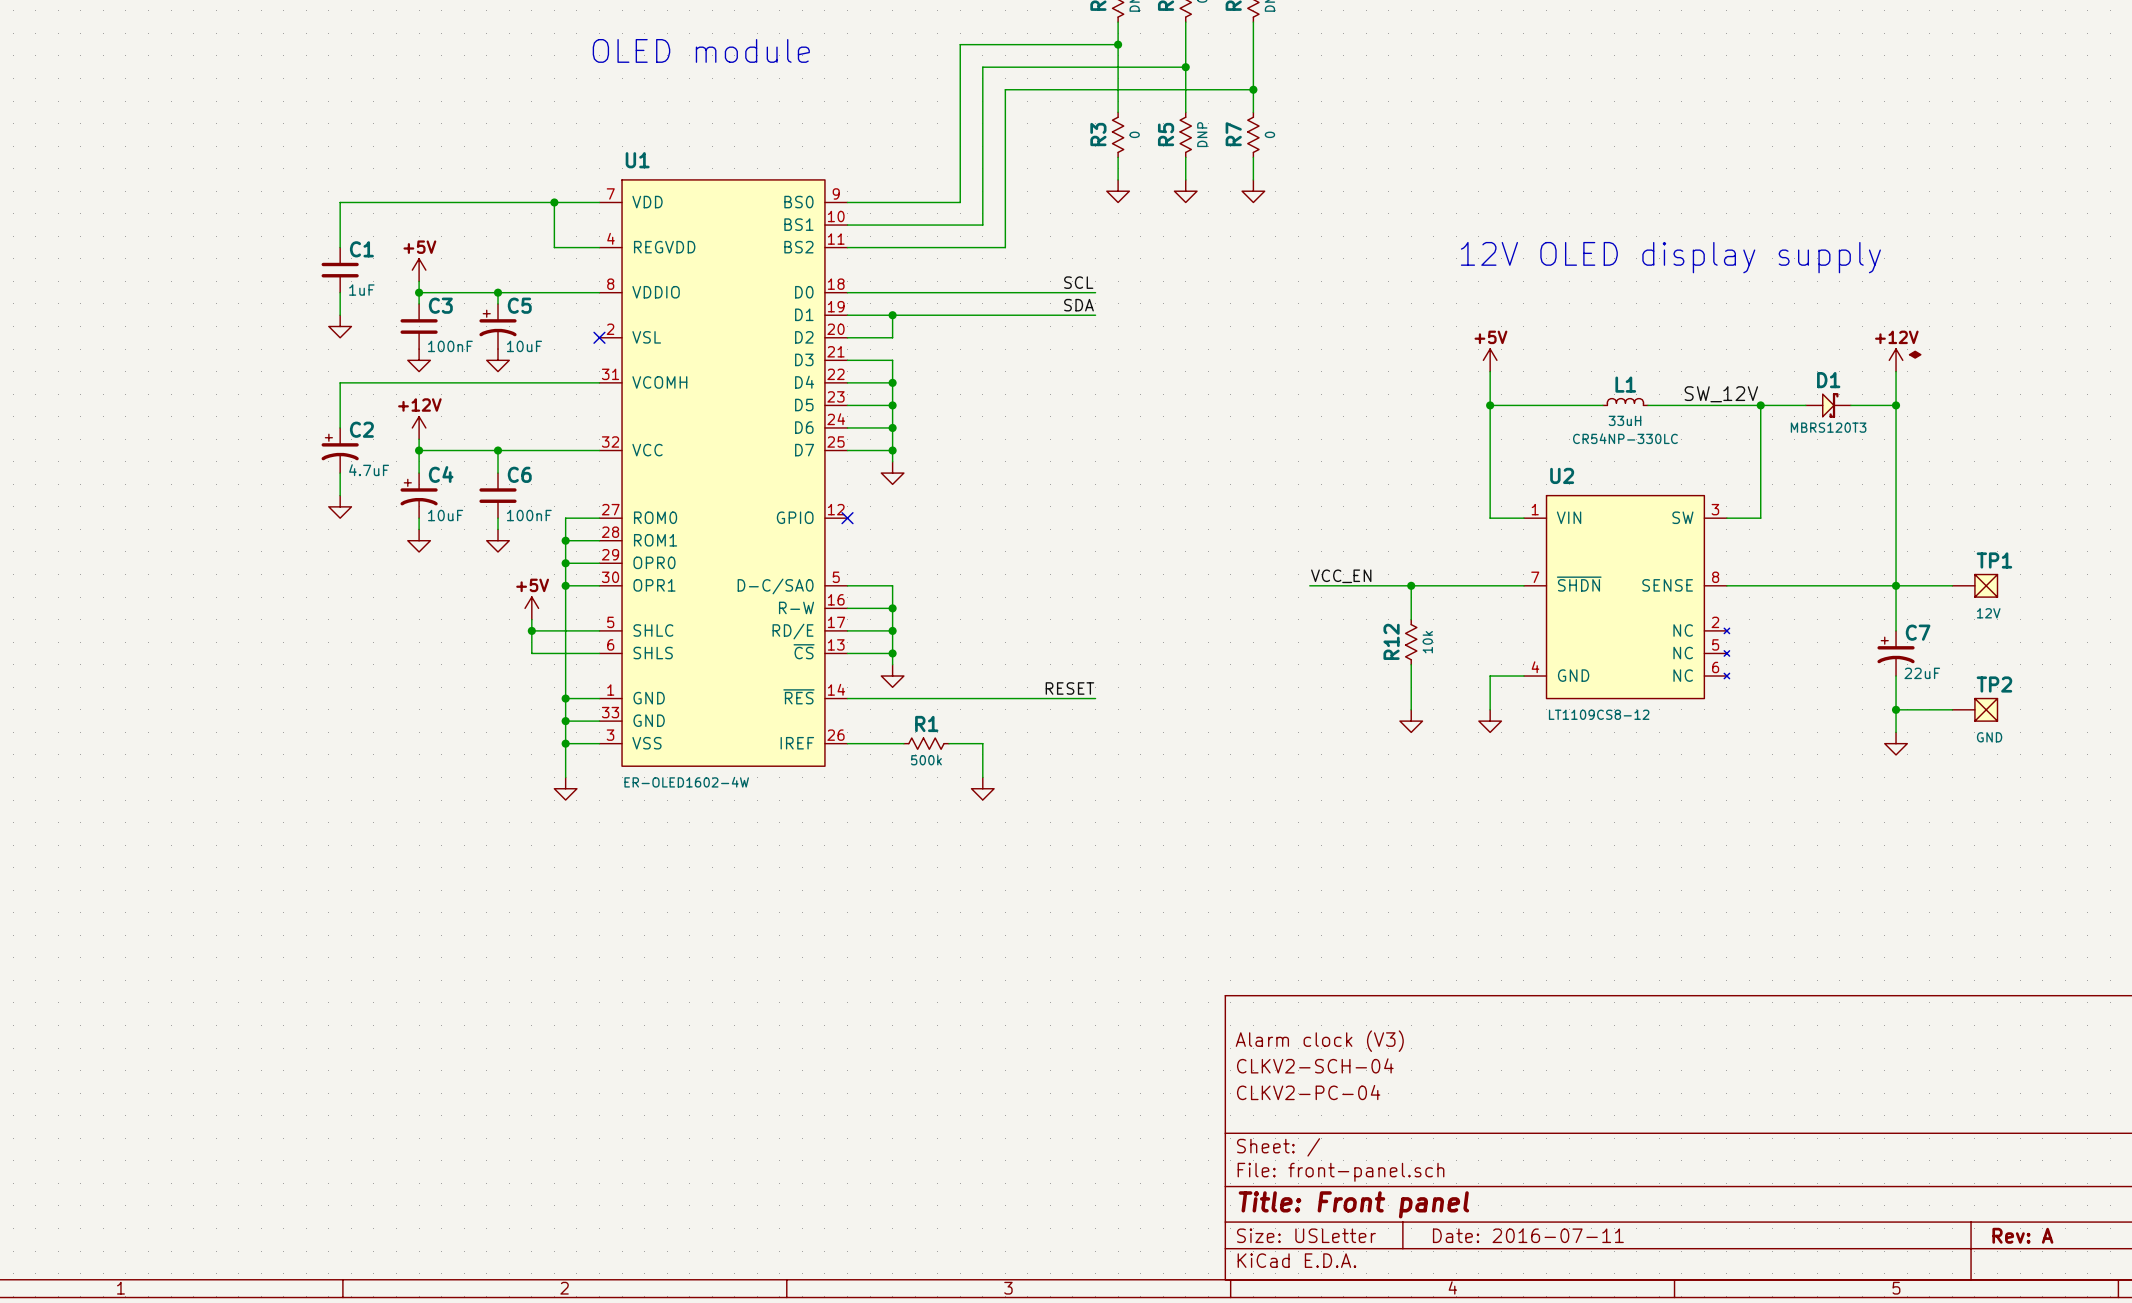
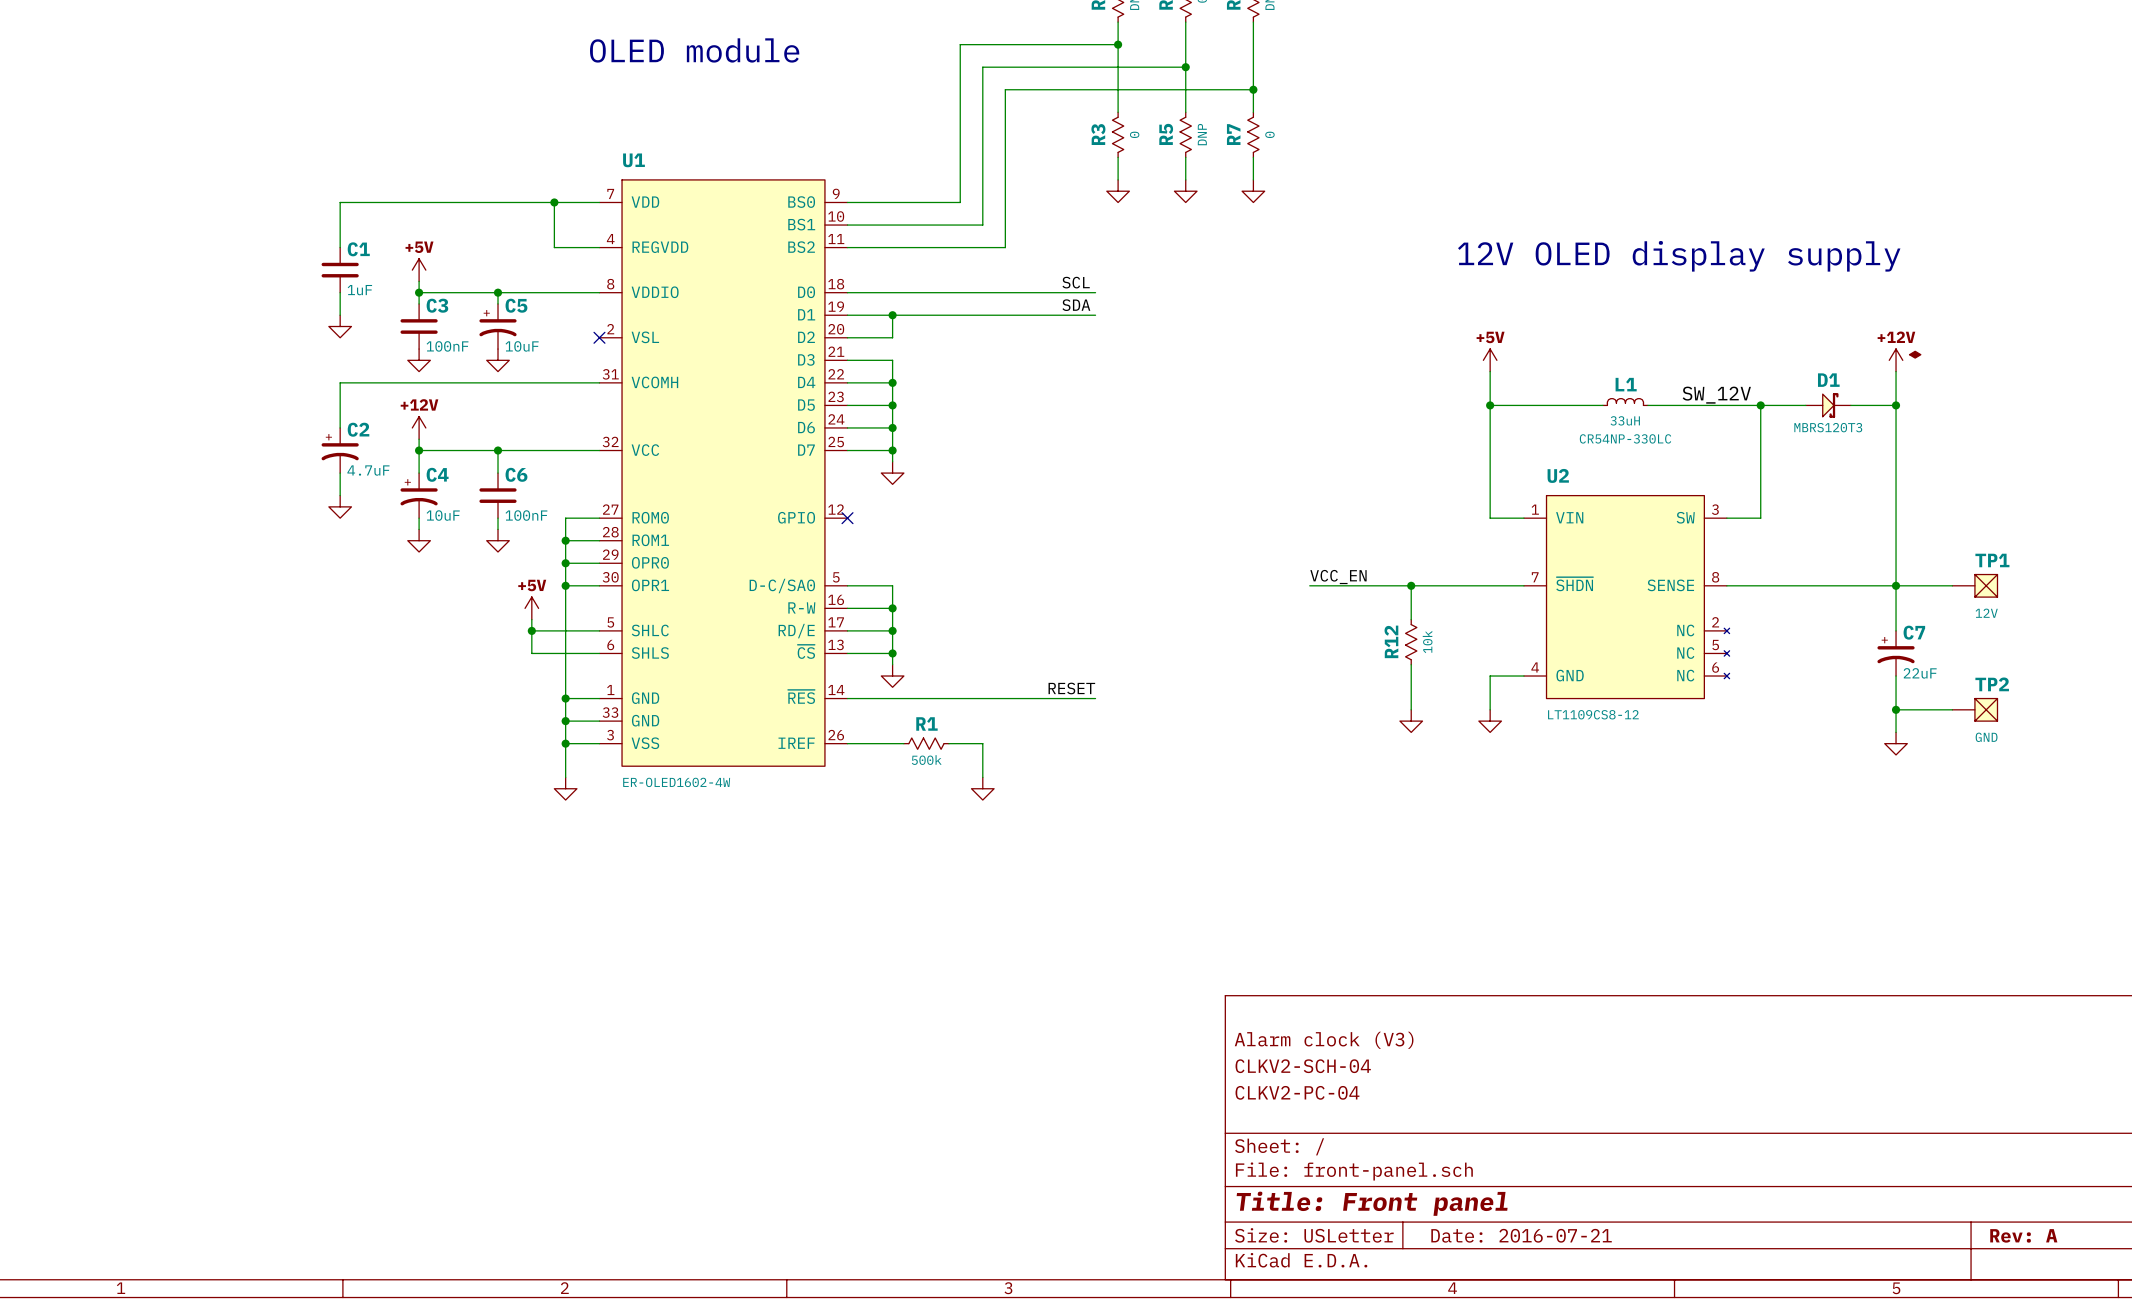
title block: Date: 2016-07-11 (1528, 1235) -> Date: 2016-07-21 (1521, 1235)

